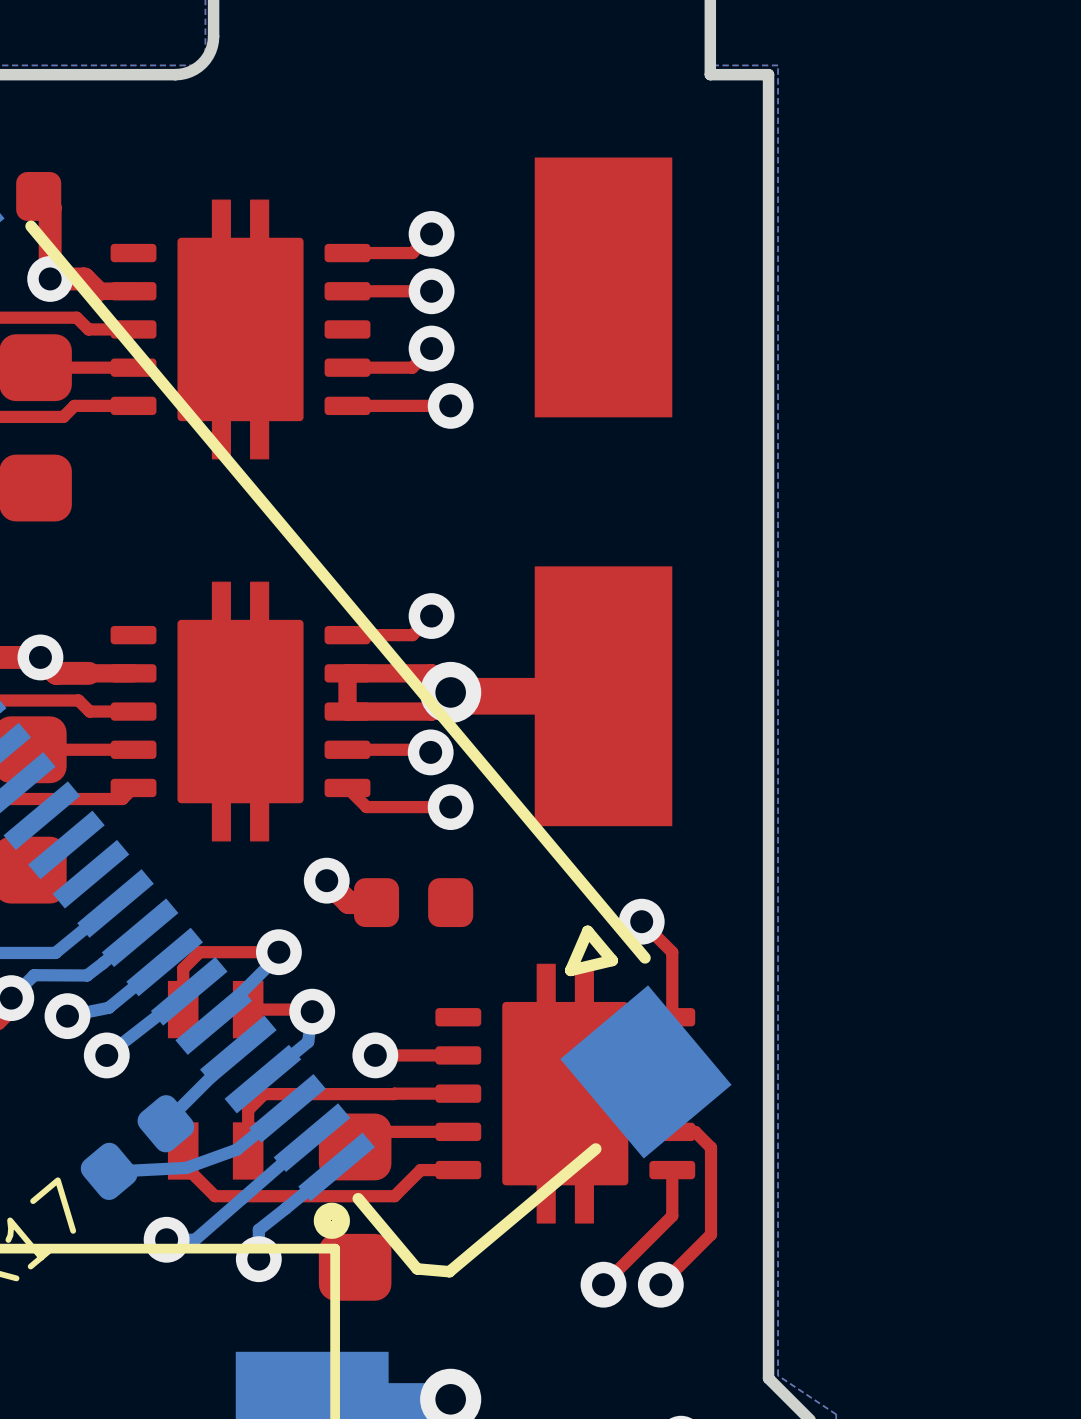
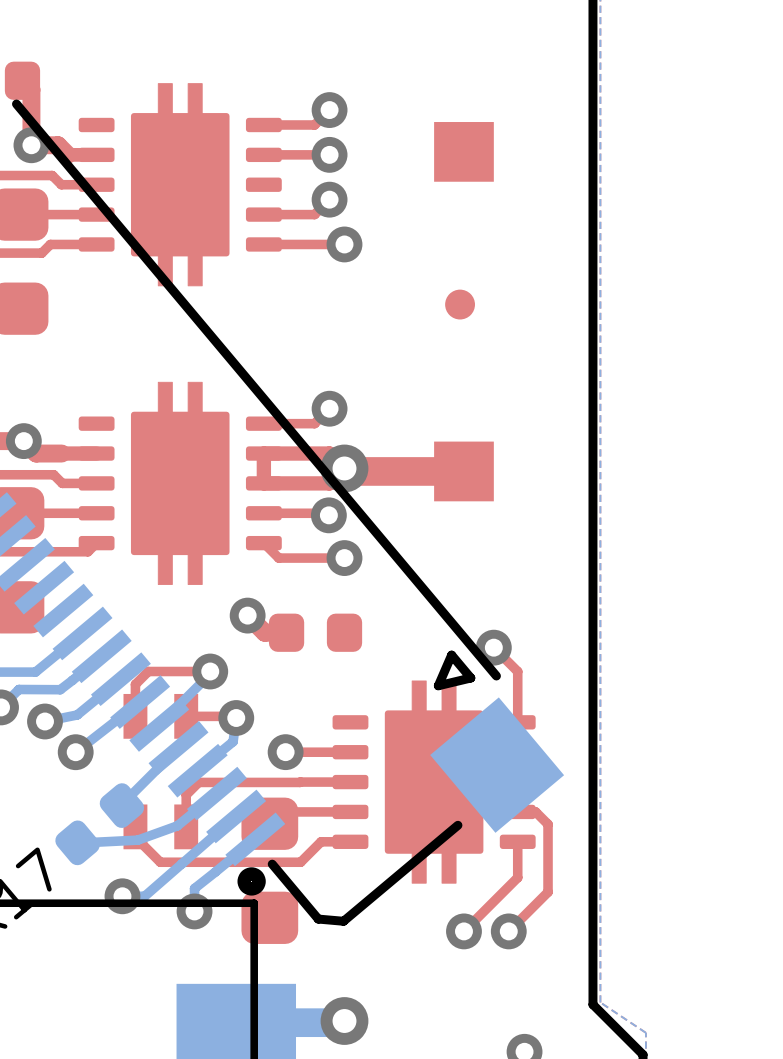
part footprint: [534, 157, 673, 418] -> [434, 122, 494, 182]
part: none -> (460, 304)
part footprint: [534, 566, 673, 827] -> [434, 441, 494, 502]

